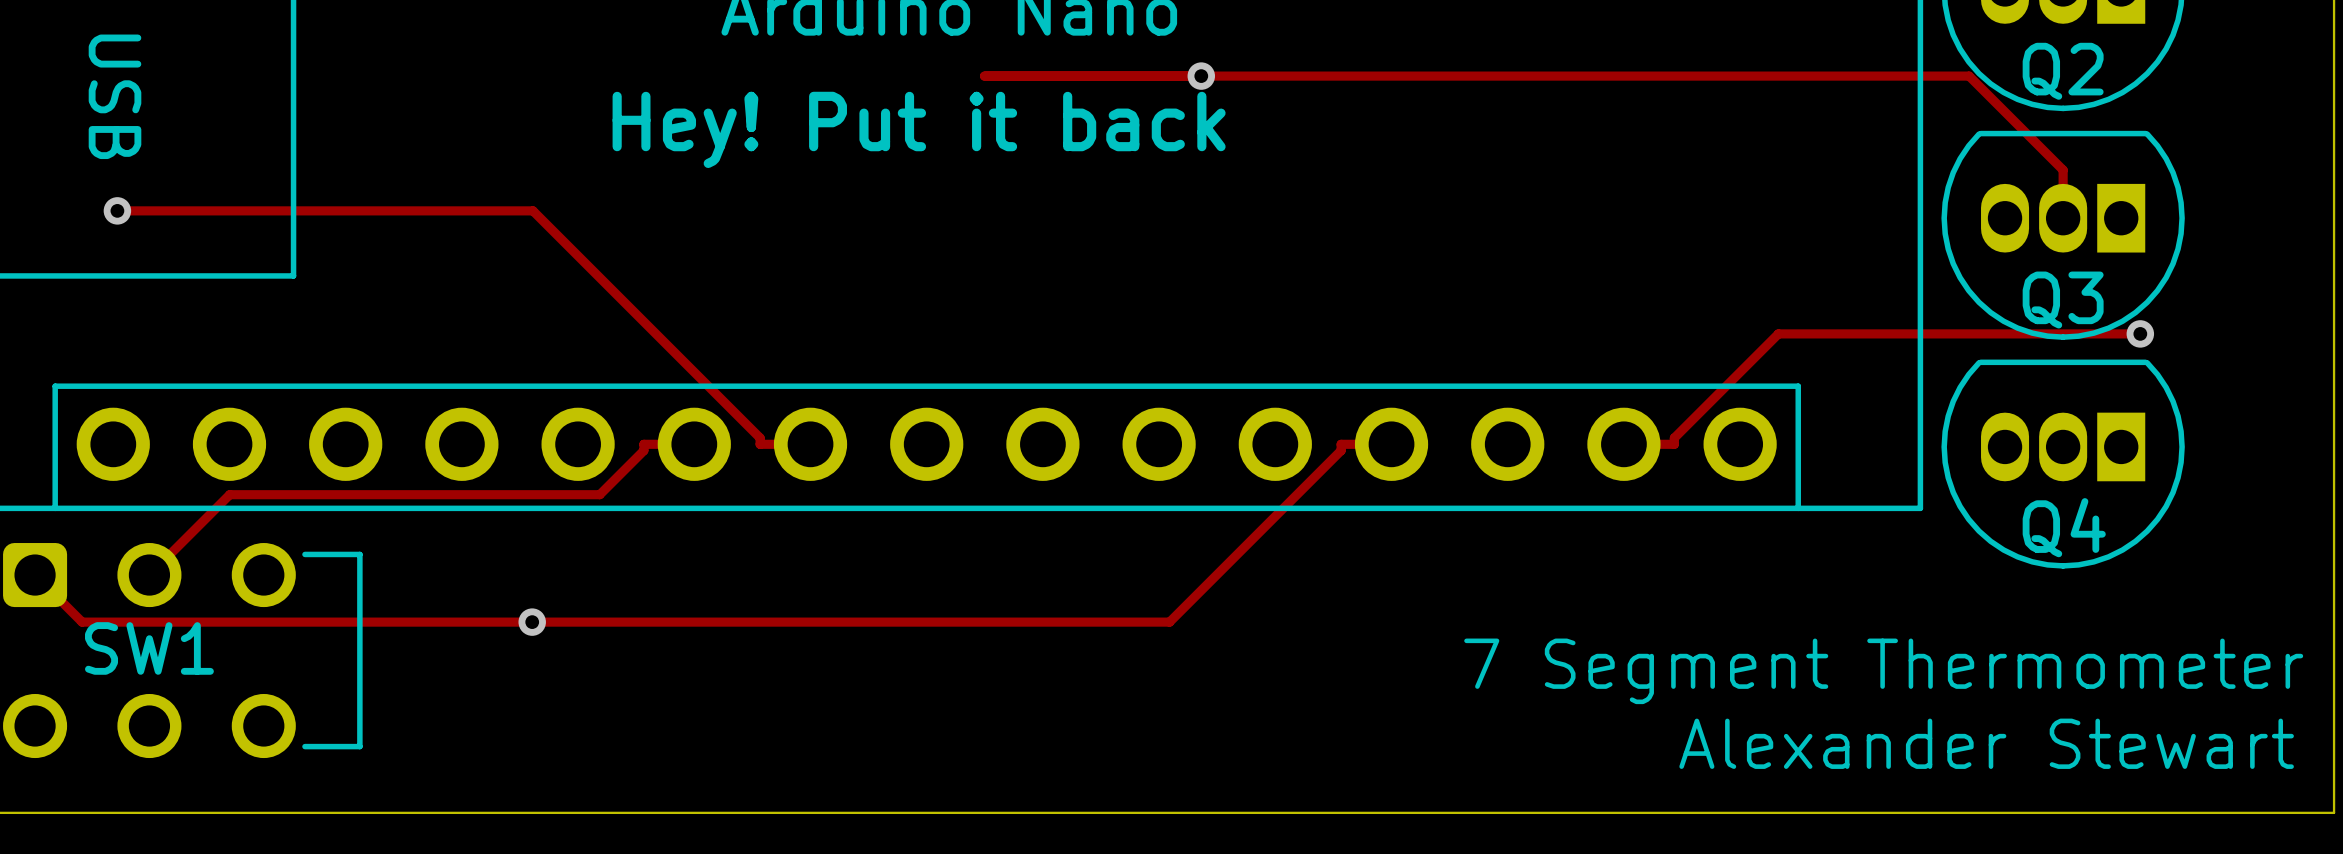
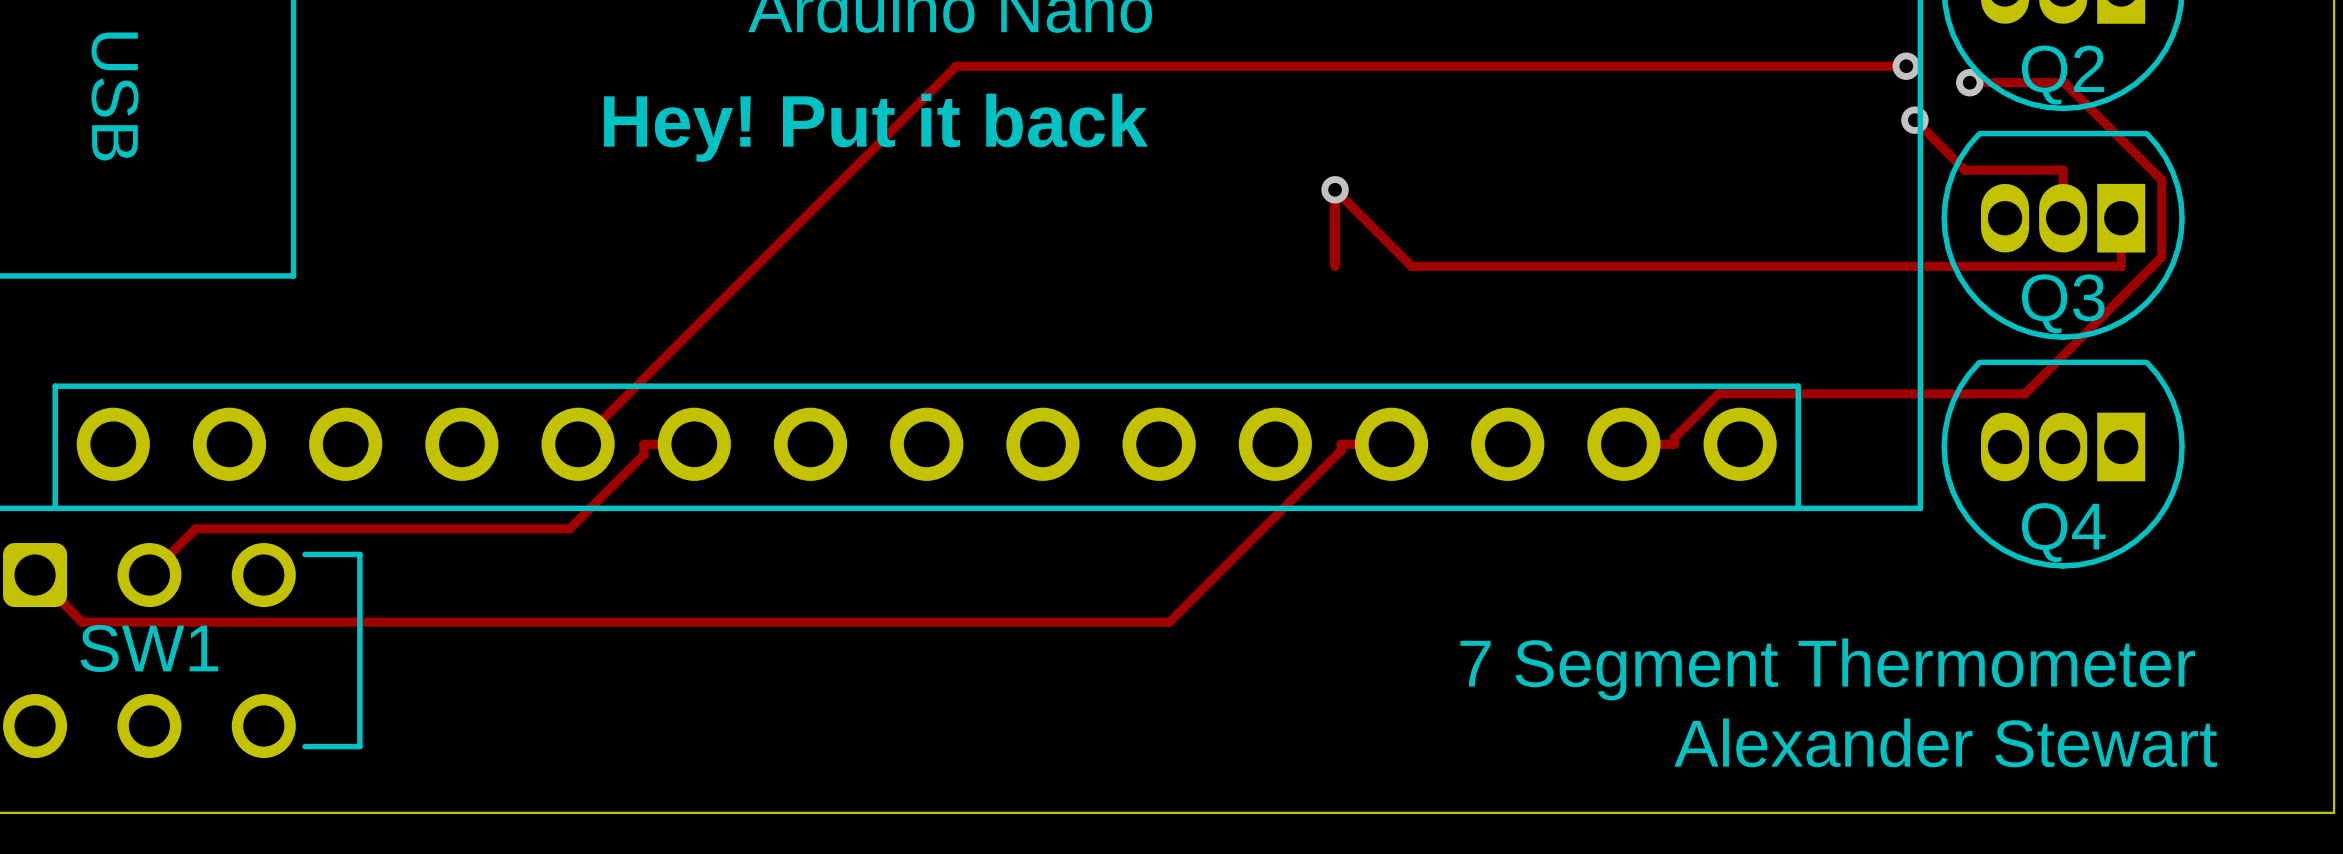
track: none -> (1906, 66) (956, 66) (578, 444)
via: none -> (1906, 66)
track: (984, 76) (1969, 76) (2063, 170) -> (1914, 120) (1964, 170) (2063, 170)
via position: (1201, 76) -> (1335, 189)
via: none -> (1969, 82)
via: none -> (1914, 120)
track: (117, 210) (532, 210) (760, 438) (760, 444) (810, 444) -> none
via: (117, 210) -> none
track: none -> (2121, 218) (2121, 266) (1411, 266) (1335, 189) (1335, 266)
track: (2140, 333) (1778, 333) (1718, 393) -> (1969, 82) (2064, 82) (2161, 180) (2161, 257) (2024, 393) (1718, 393)
via: (2140, 333) -> none
track: (643, 450) (599, 494) (229, 494) (195, 528) -> (643, 450) (643, 454) (569, 528) (195, 528)
via: (532, 622) -> none

